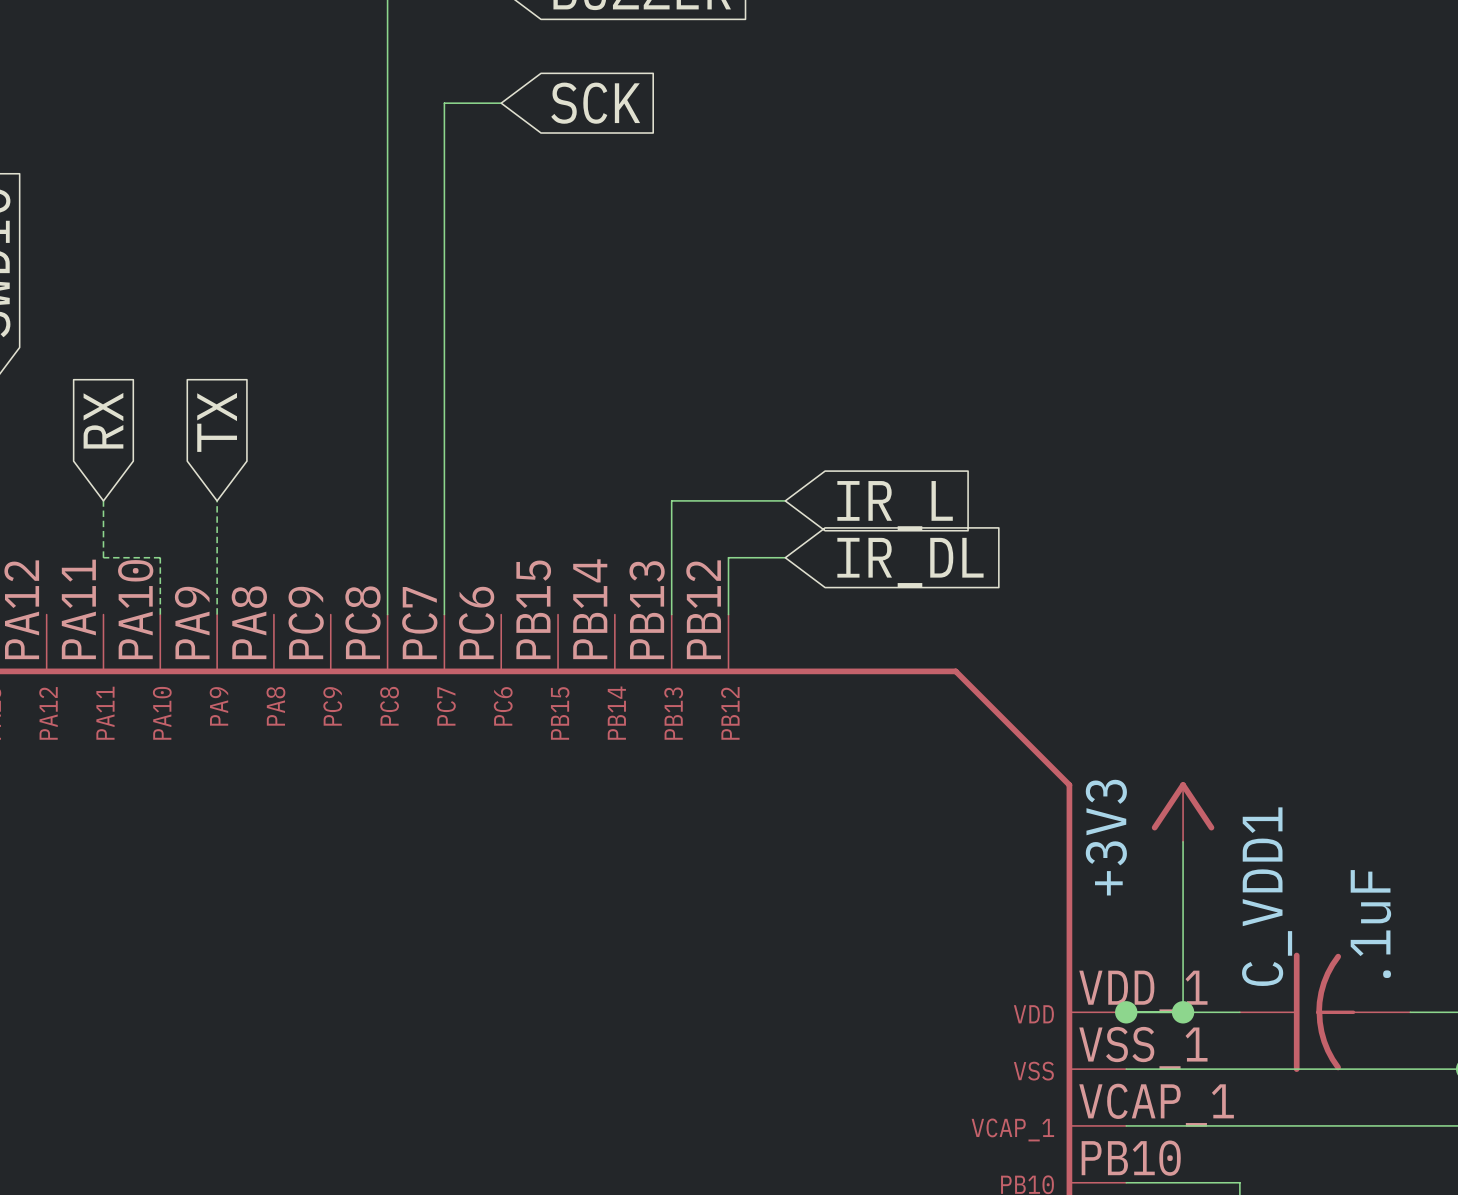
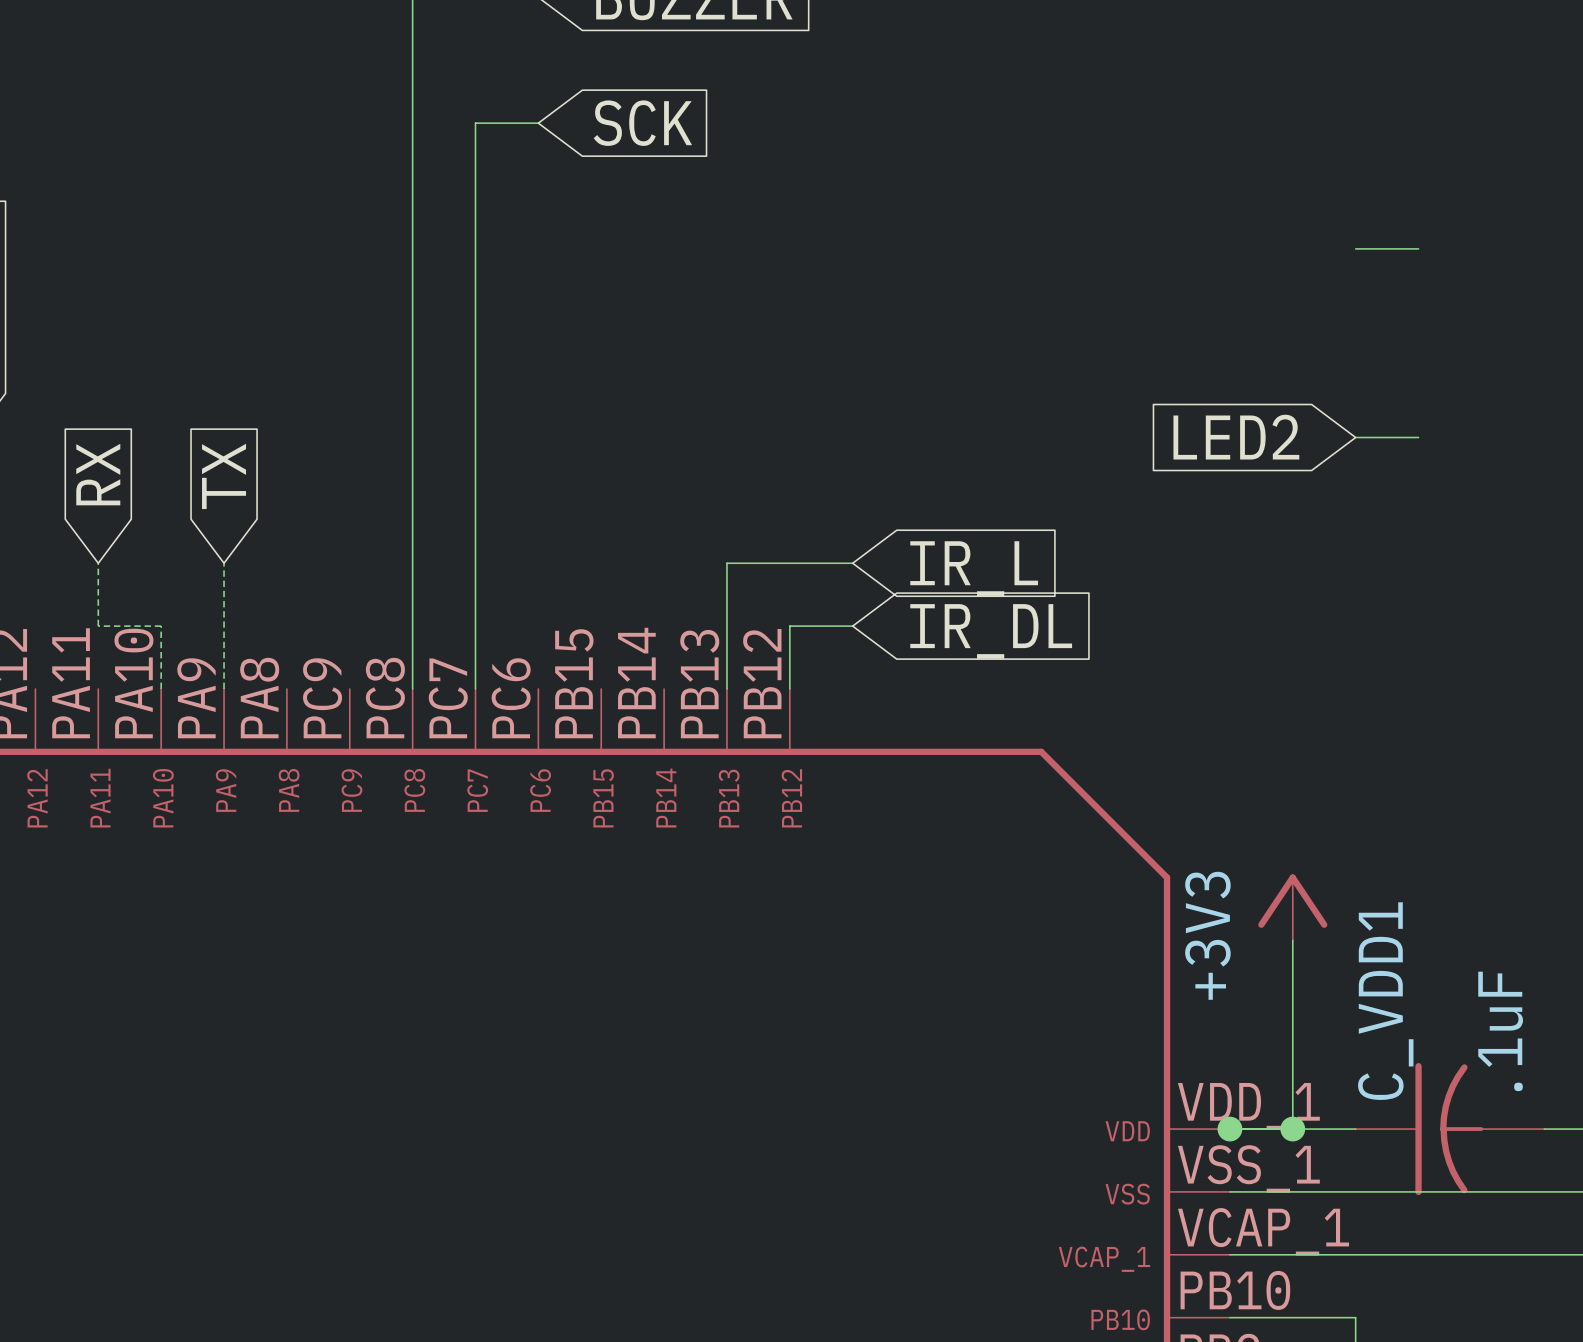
wire: none -> (1355, 248) (1418, 248)
global label: none -> LED2 (1236, 437)
wire: none -> (1355, 437) (1418, 437)

